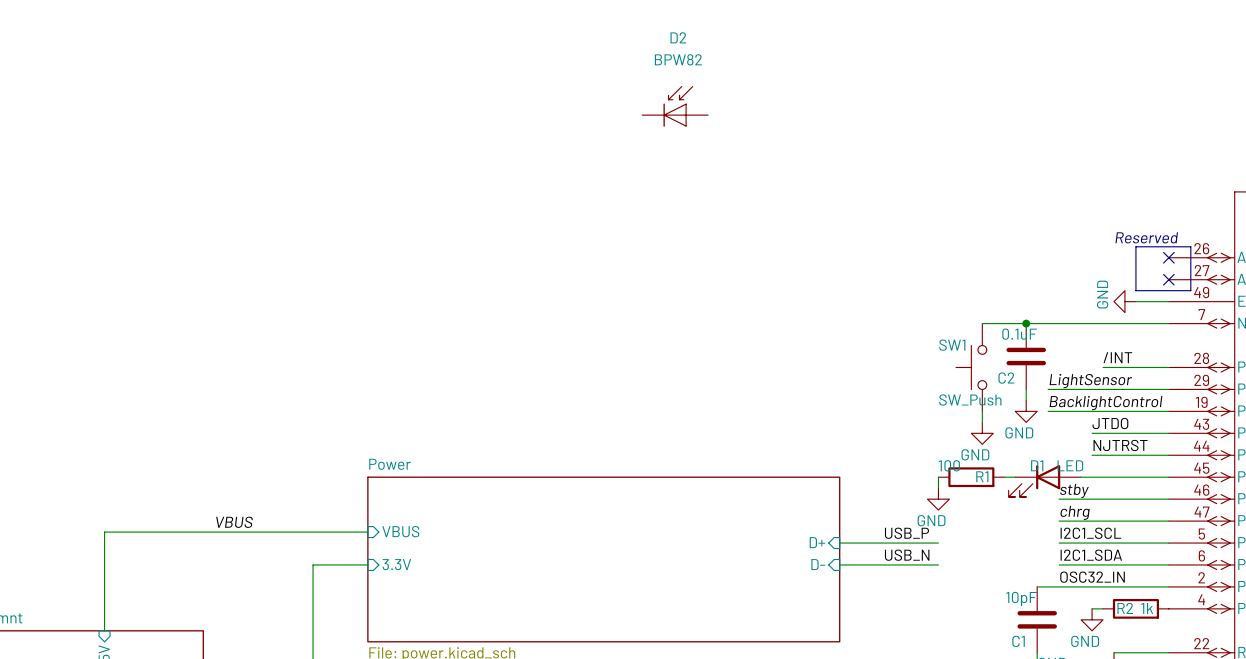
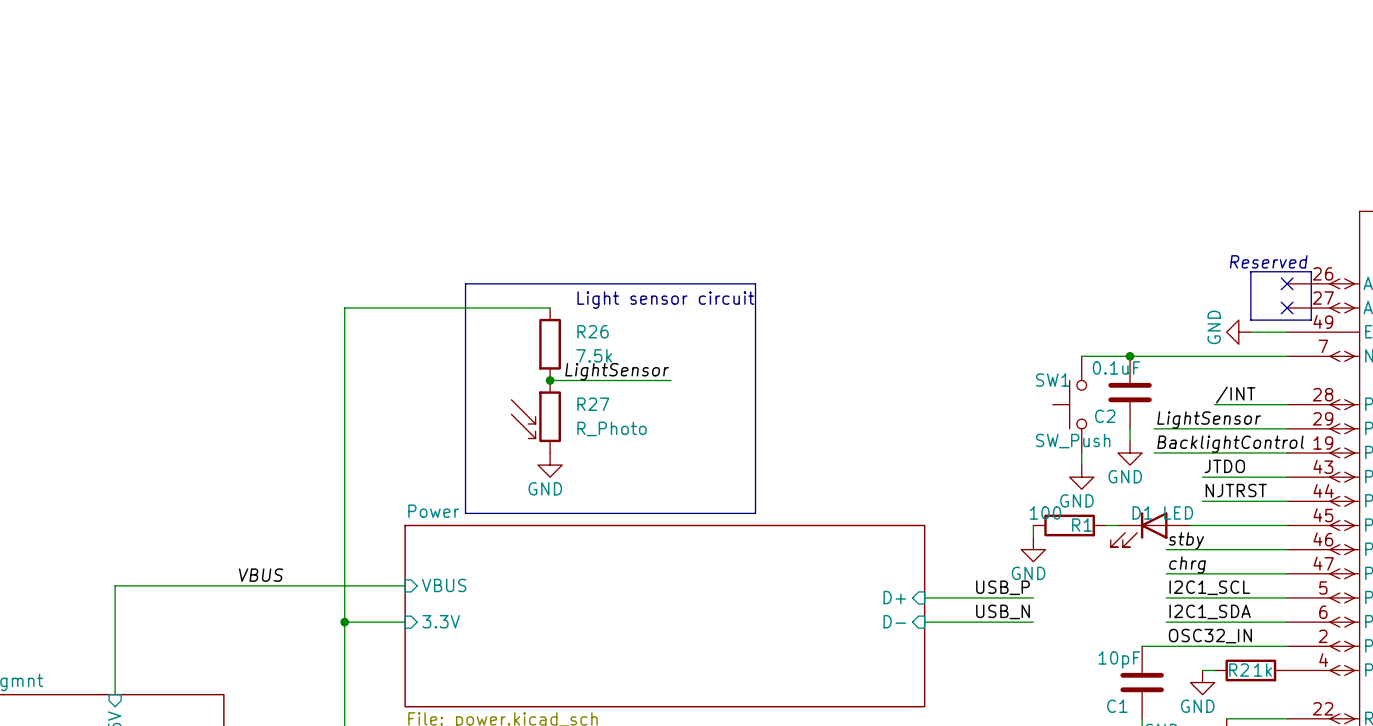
D2: BPW82 (675, 106) -> none
line: none -> (465, 283) (465, 513) (755, 513) (755, 283) (465, 283)
text: none -> Light sensor circuit (665, 300)
wire: none -> (550, 308) (344, 308) (344, 622)
R26: none -> 7.5k (550, 344)
label: none -> LightSensor (617, 371)
wire: none -> (550, 380) (670, 380)
junction: none -> (550, 380)
R27: none -> R_Photo (536, 416)
power symbol: none -> GND (550, 465)
junction: none -> (344, 622)

